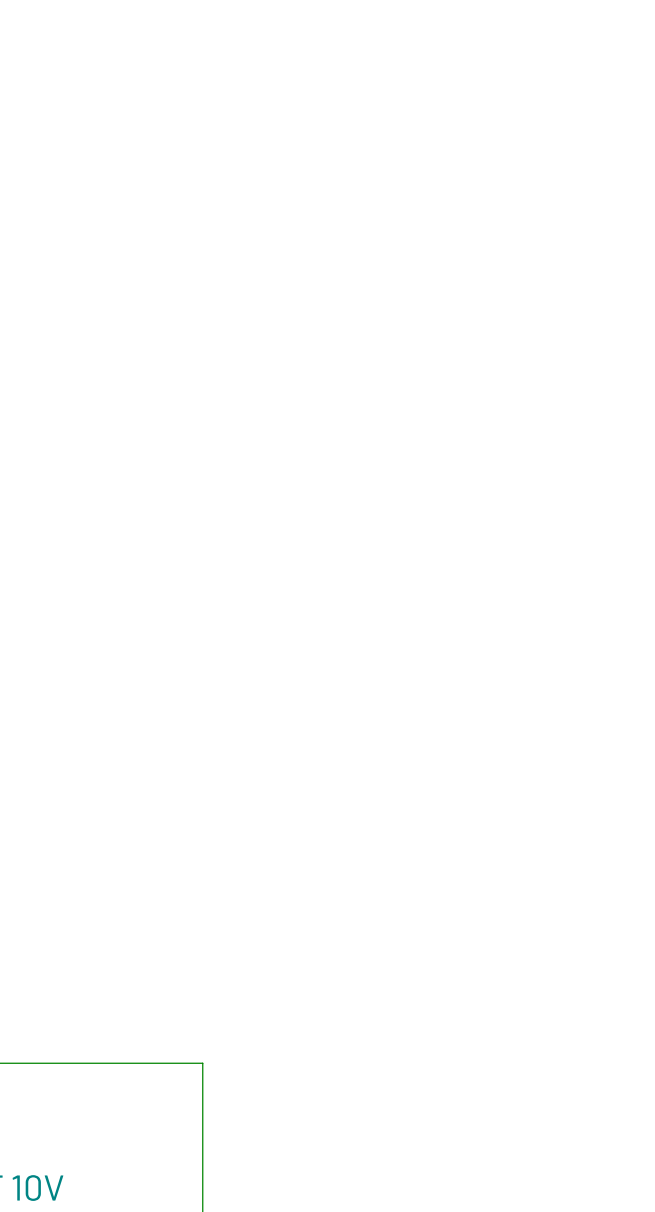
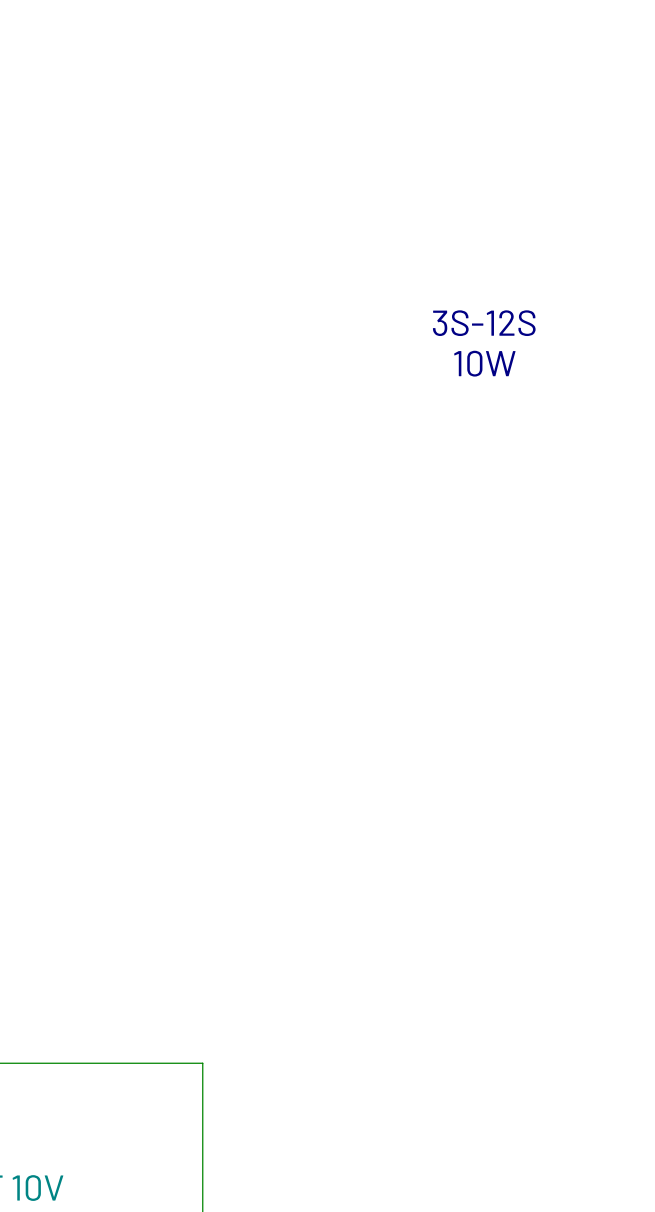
text: none -> 3S-12S (484, 323)
text: none -> 10W (484, 363)

